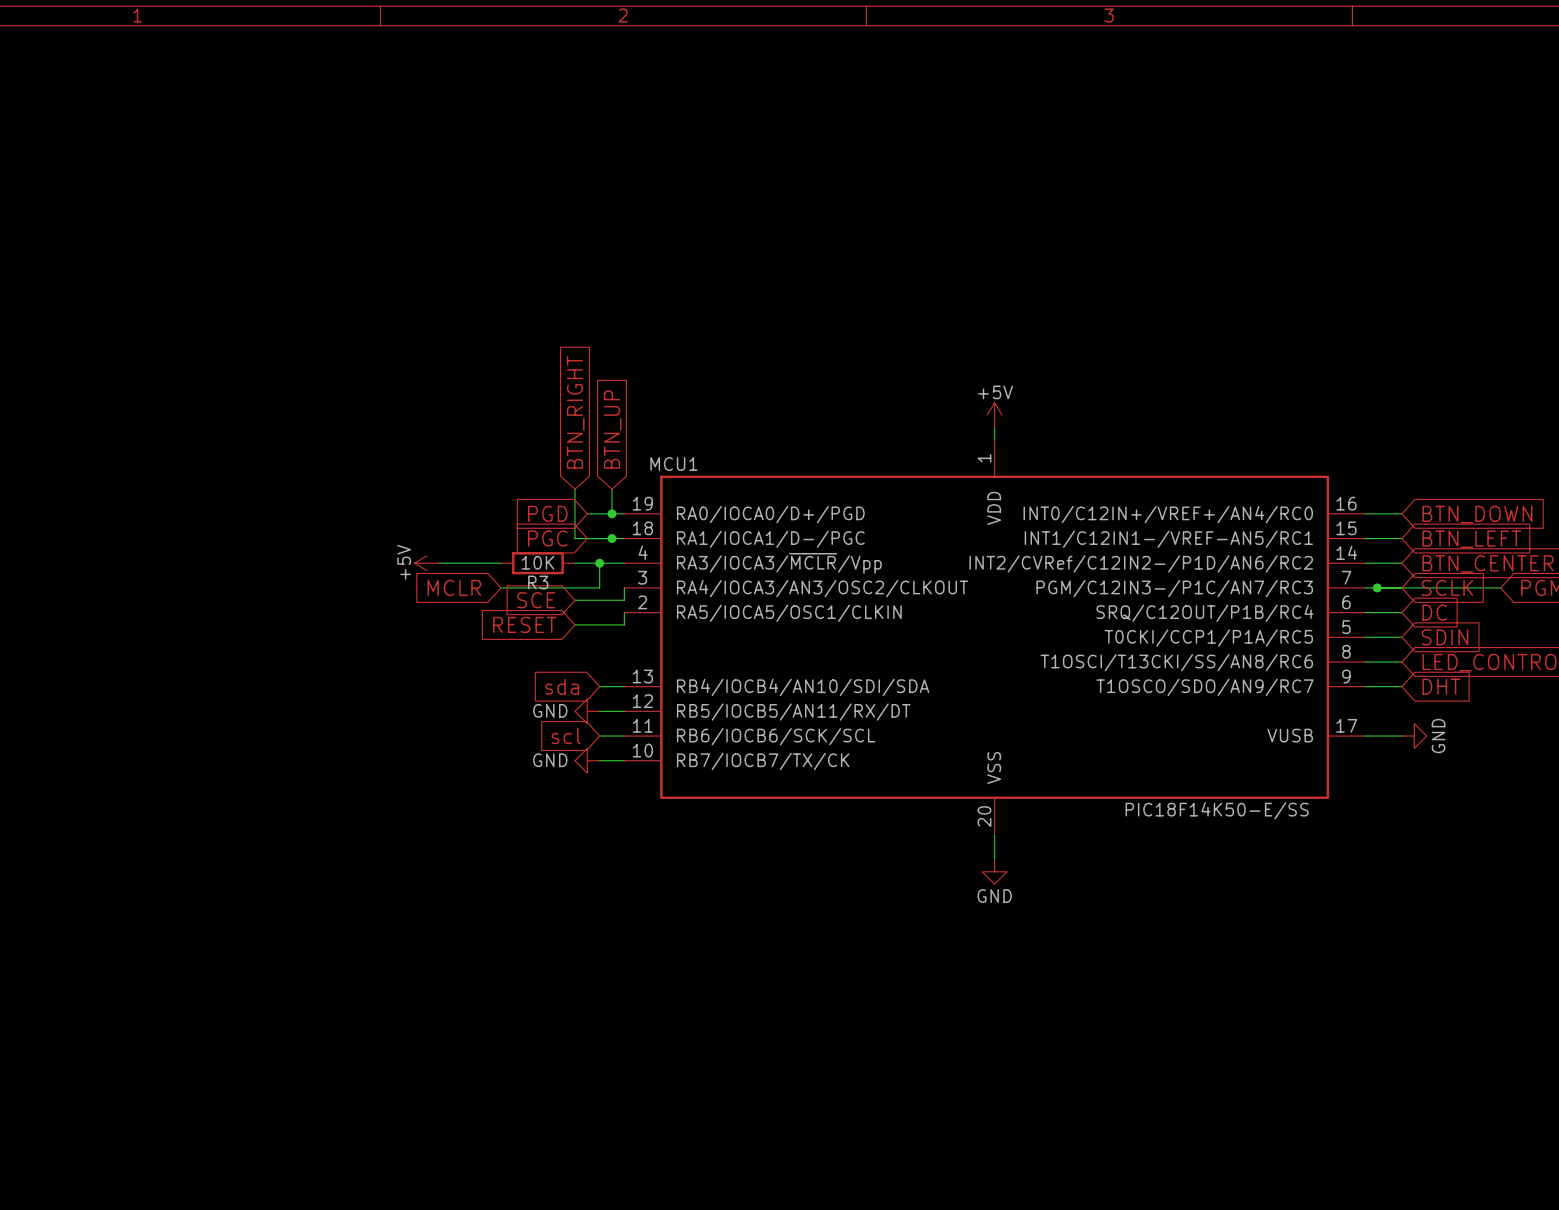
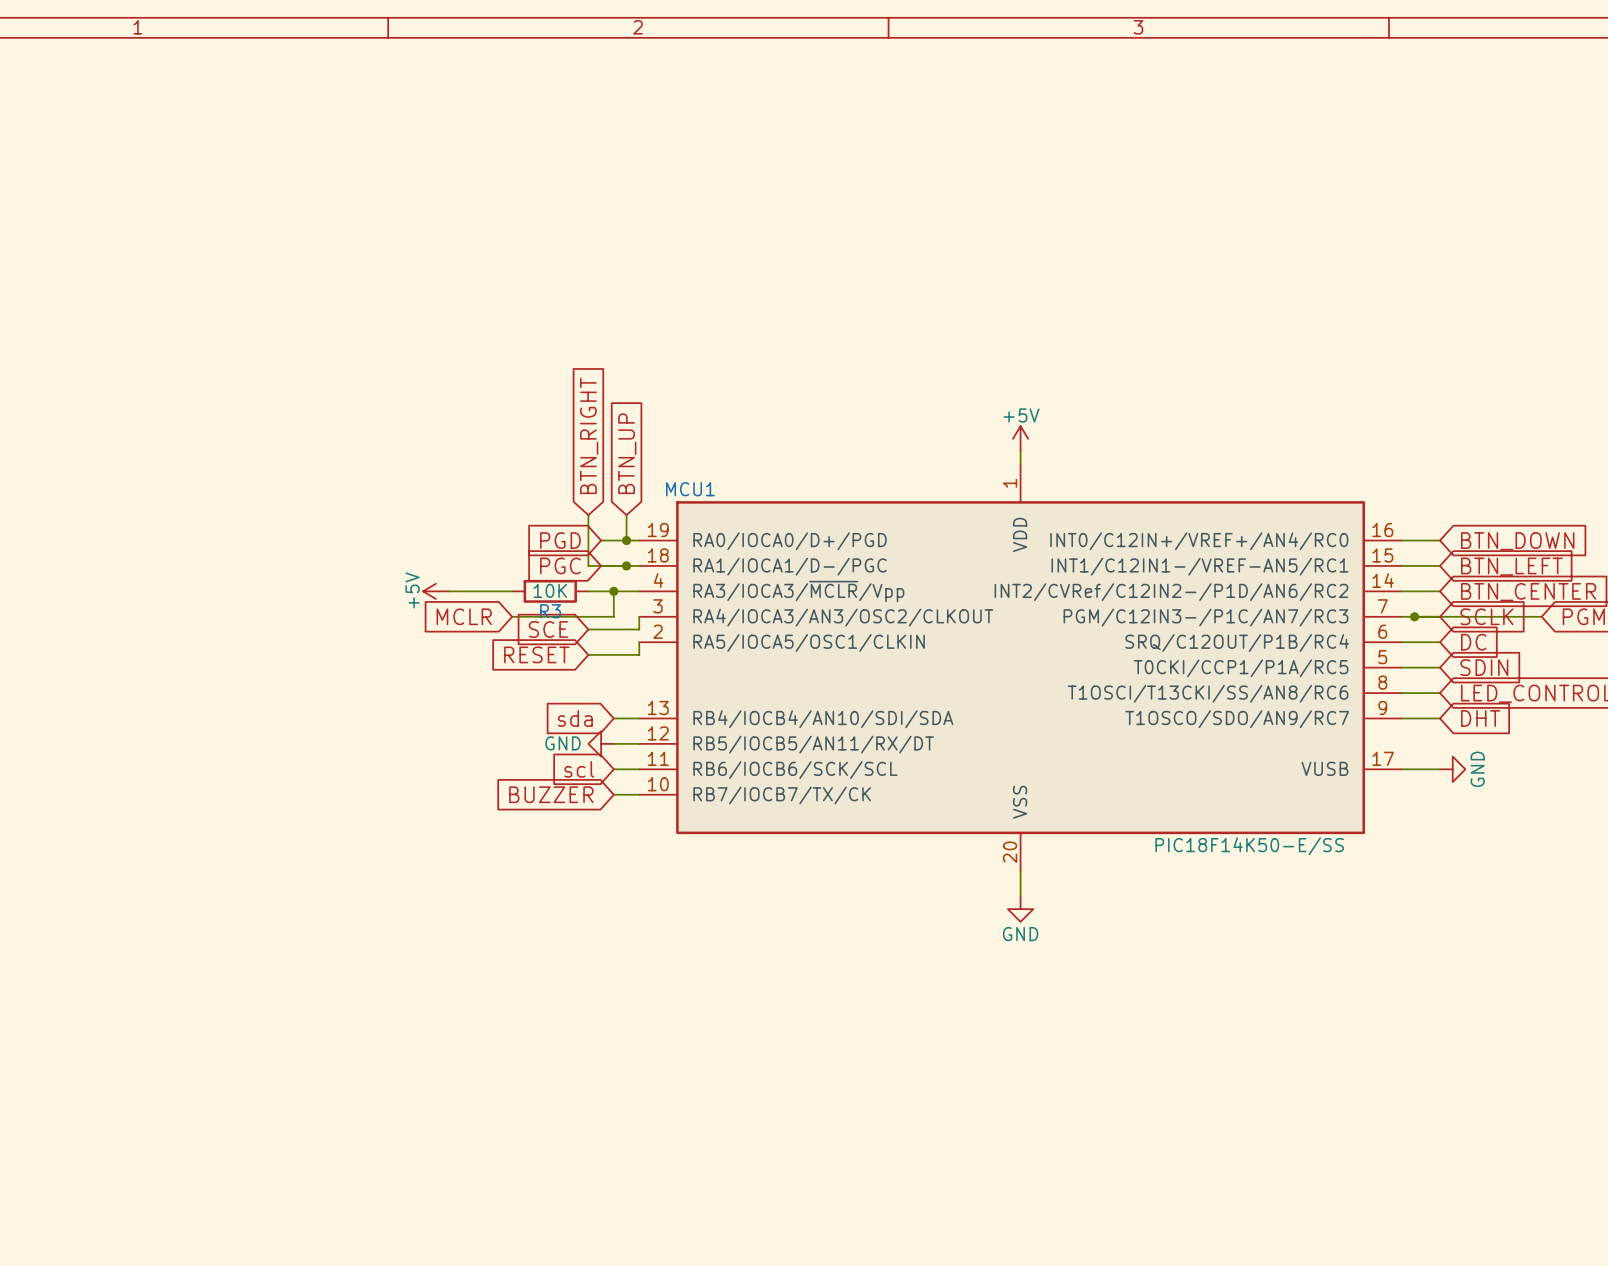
global label: none -> BUZZER (551, 794)
power symbol: GND (587, 760) -> none

